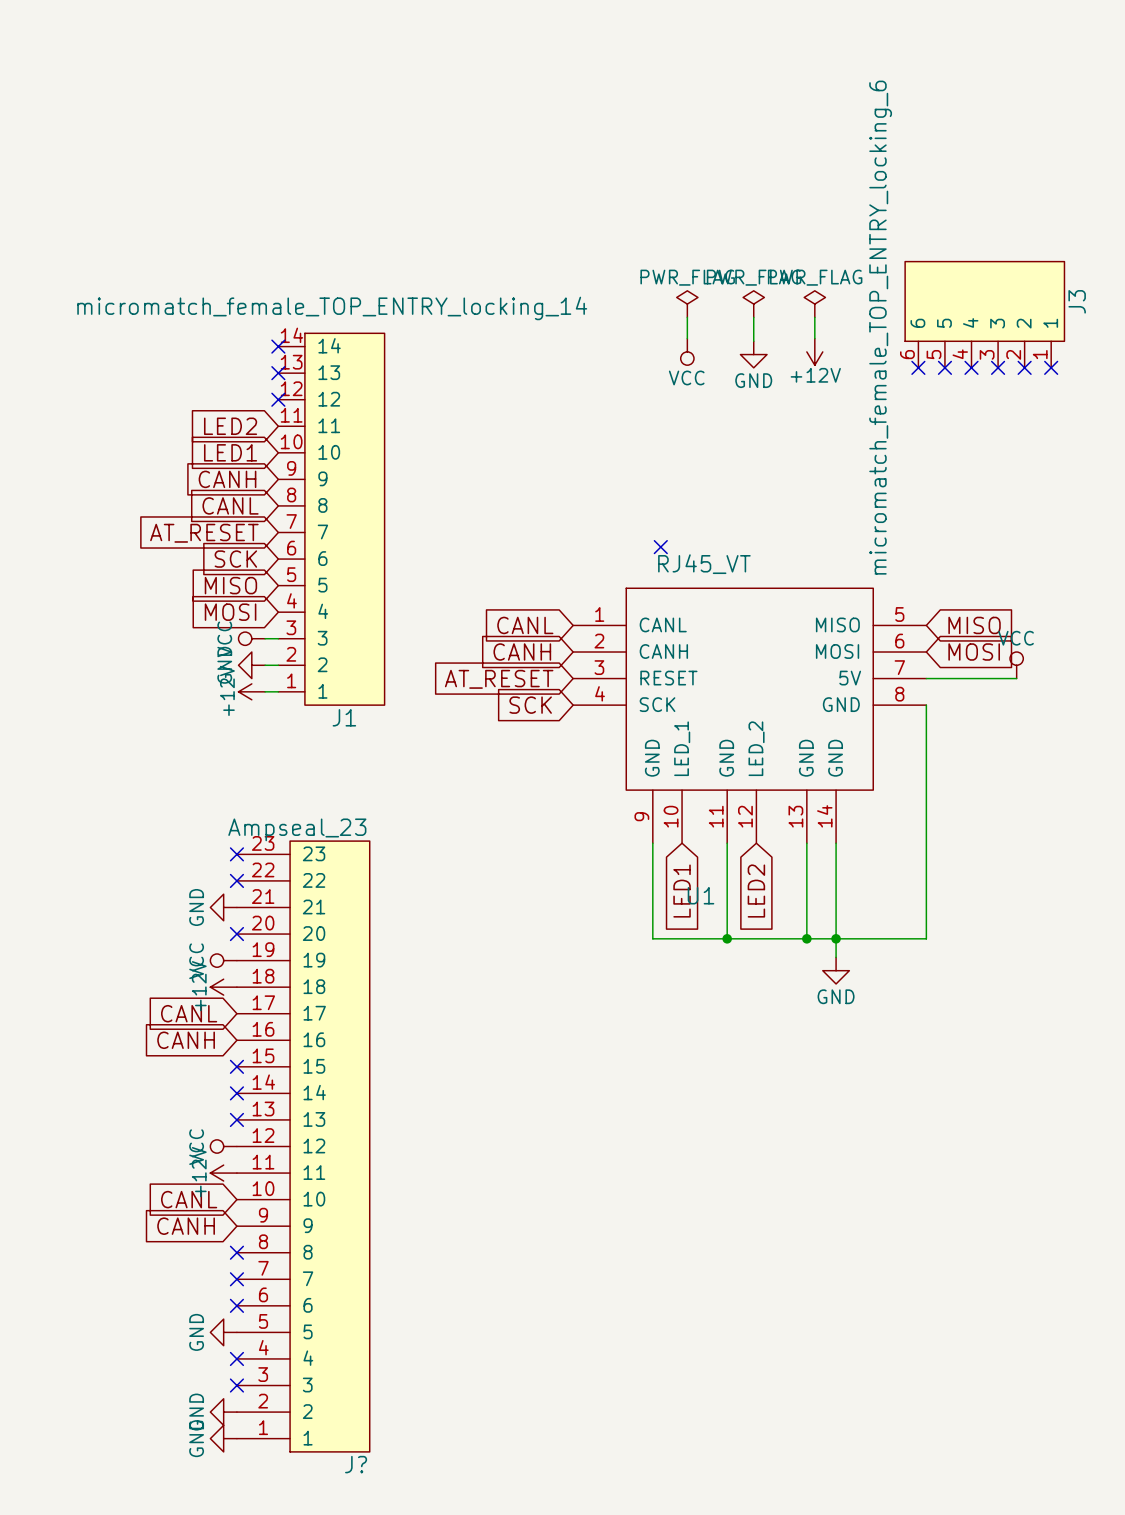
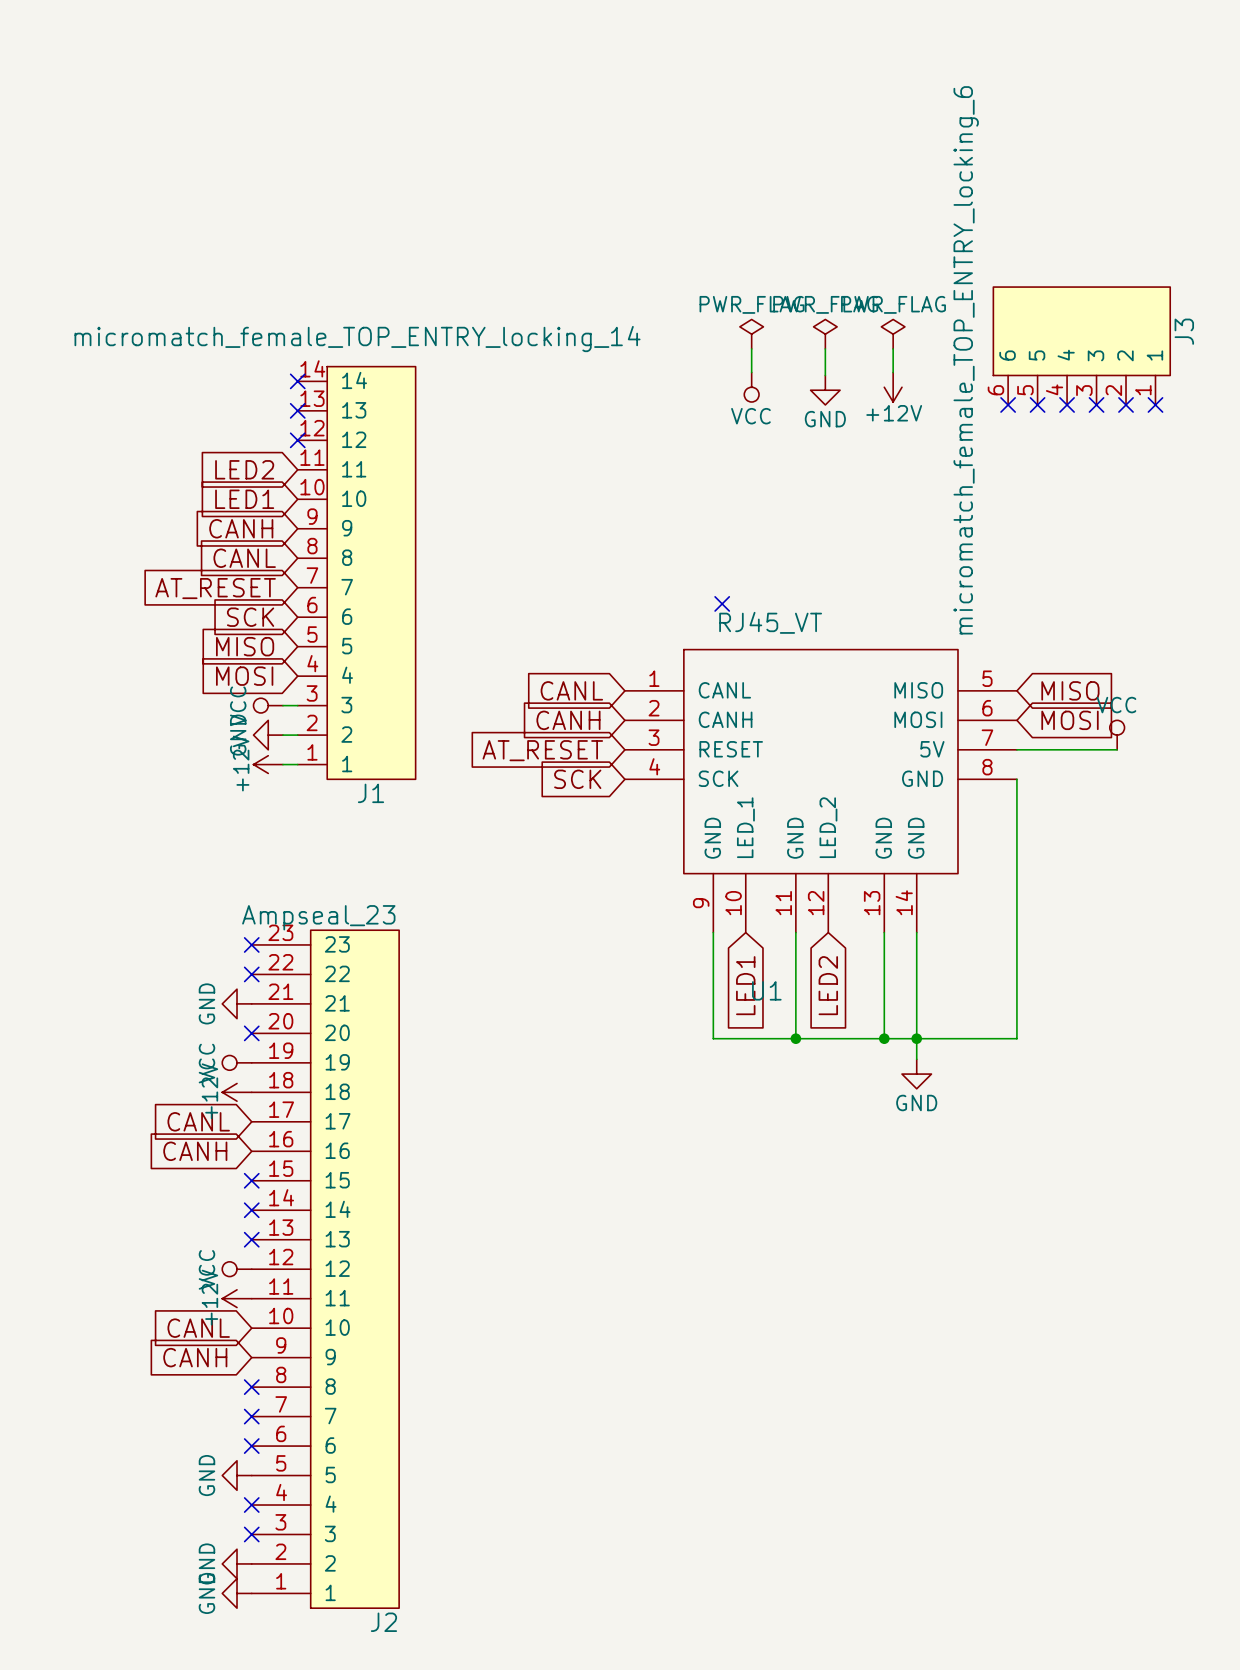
J? name: J? (356, 1464) -> J2 (383, 1622)

